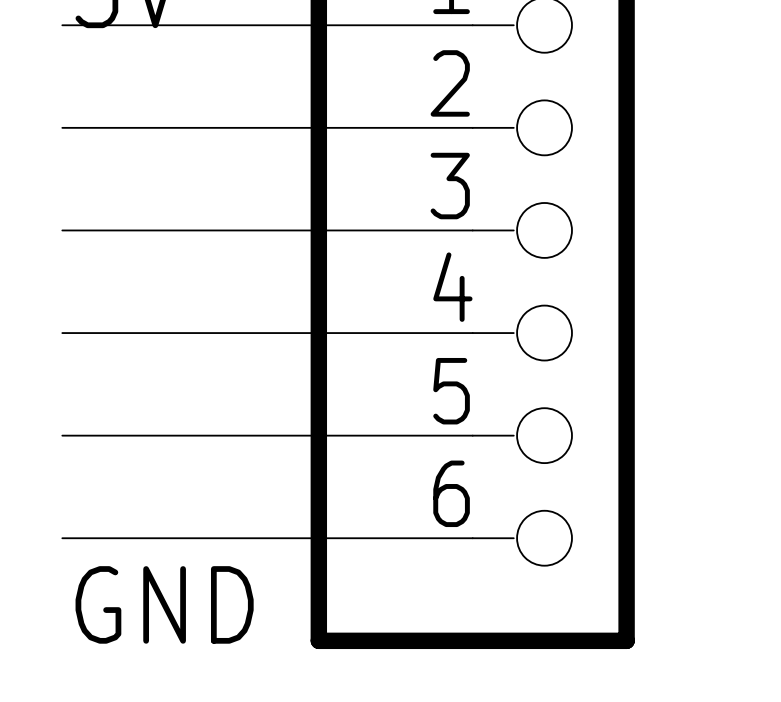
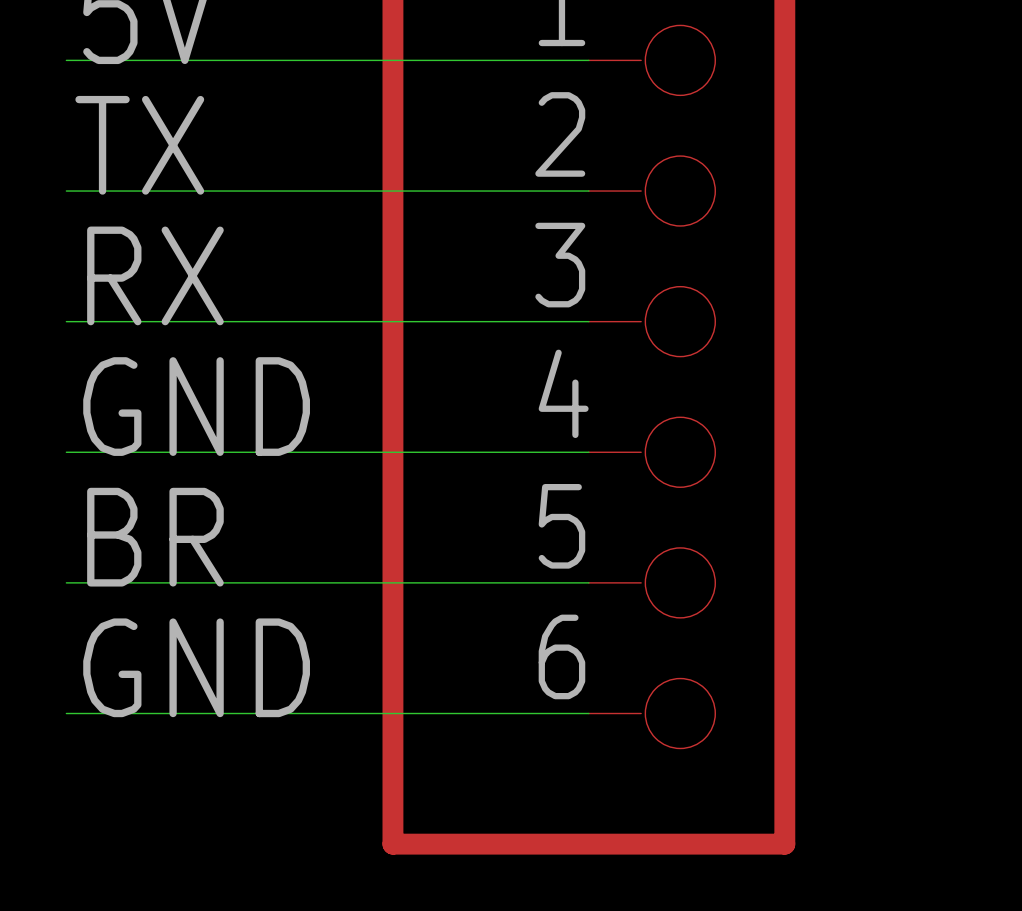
label: none -> TX (139, 145)
label: none -> RX (155, 275)
label: none -> GND (196, 406)
label: none -> BR (155, 537)
label position: GND (164, 604) -> GND (196, 667)

